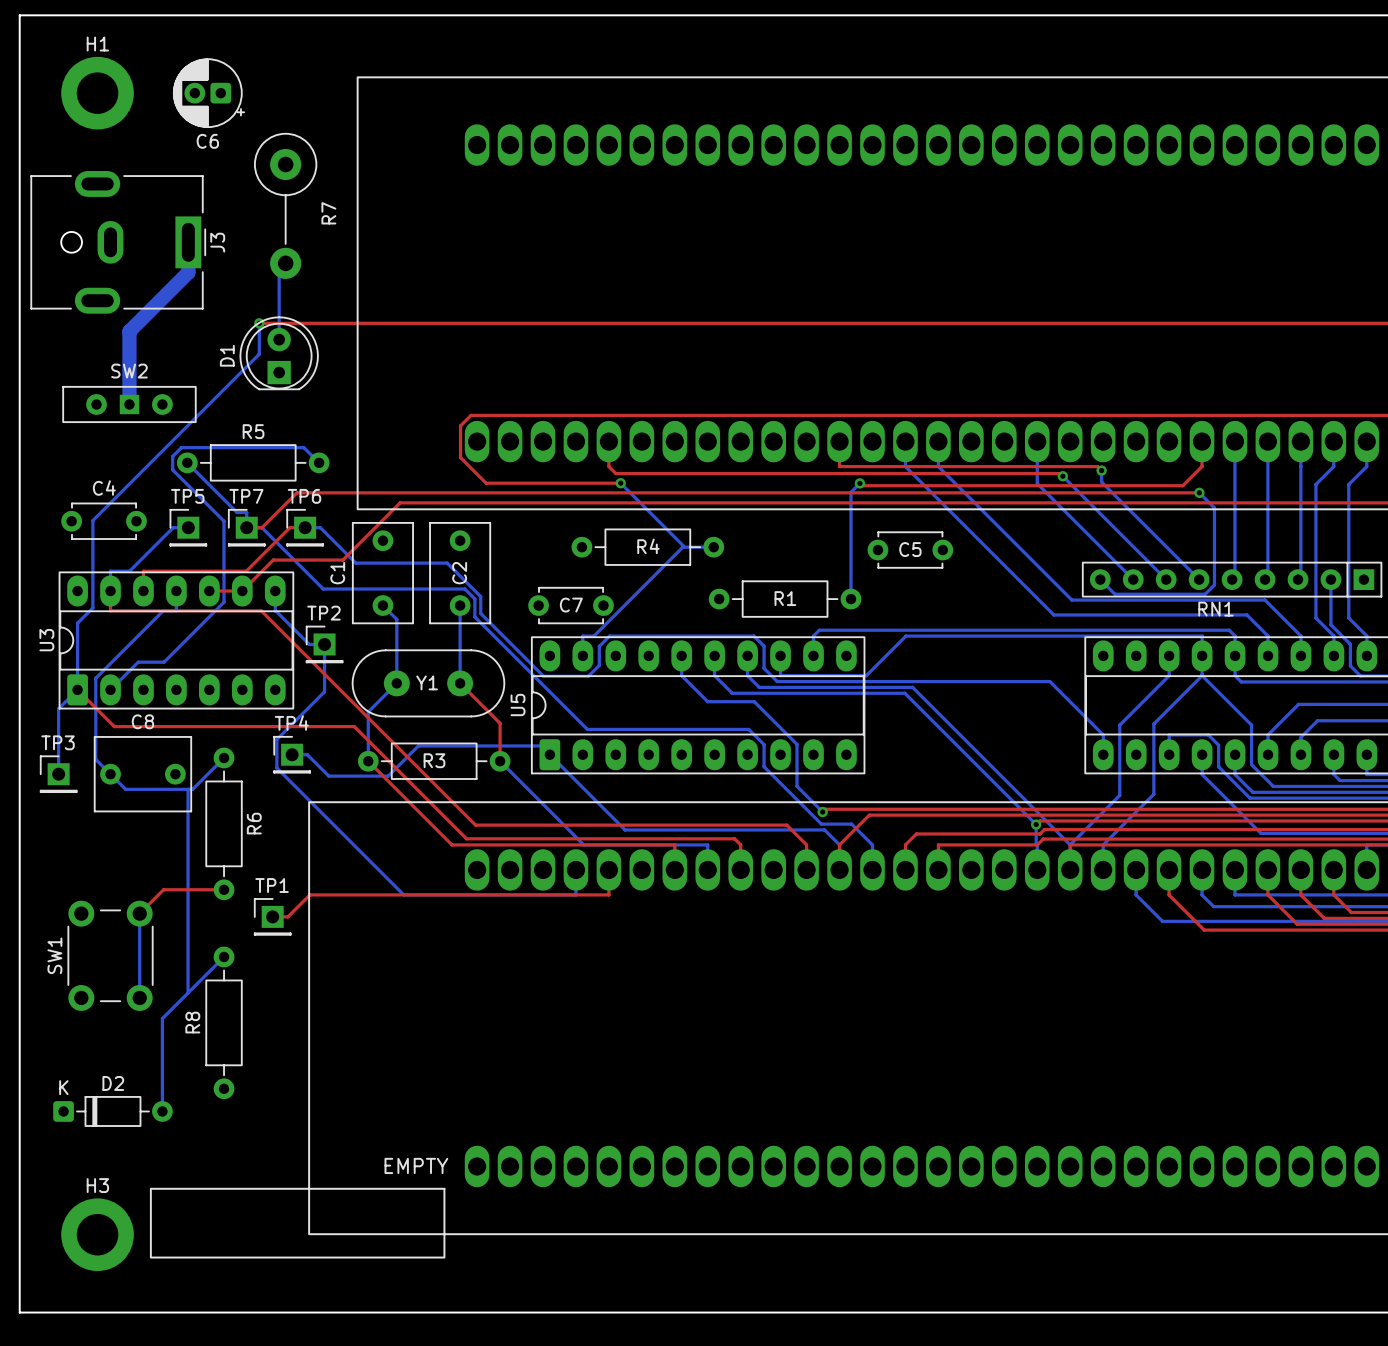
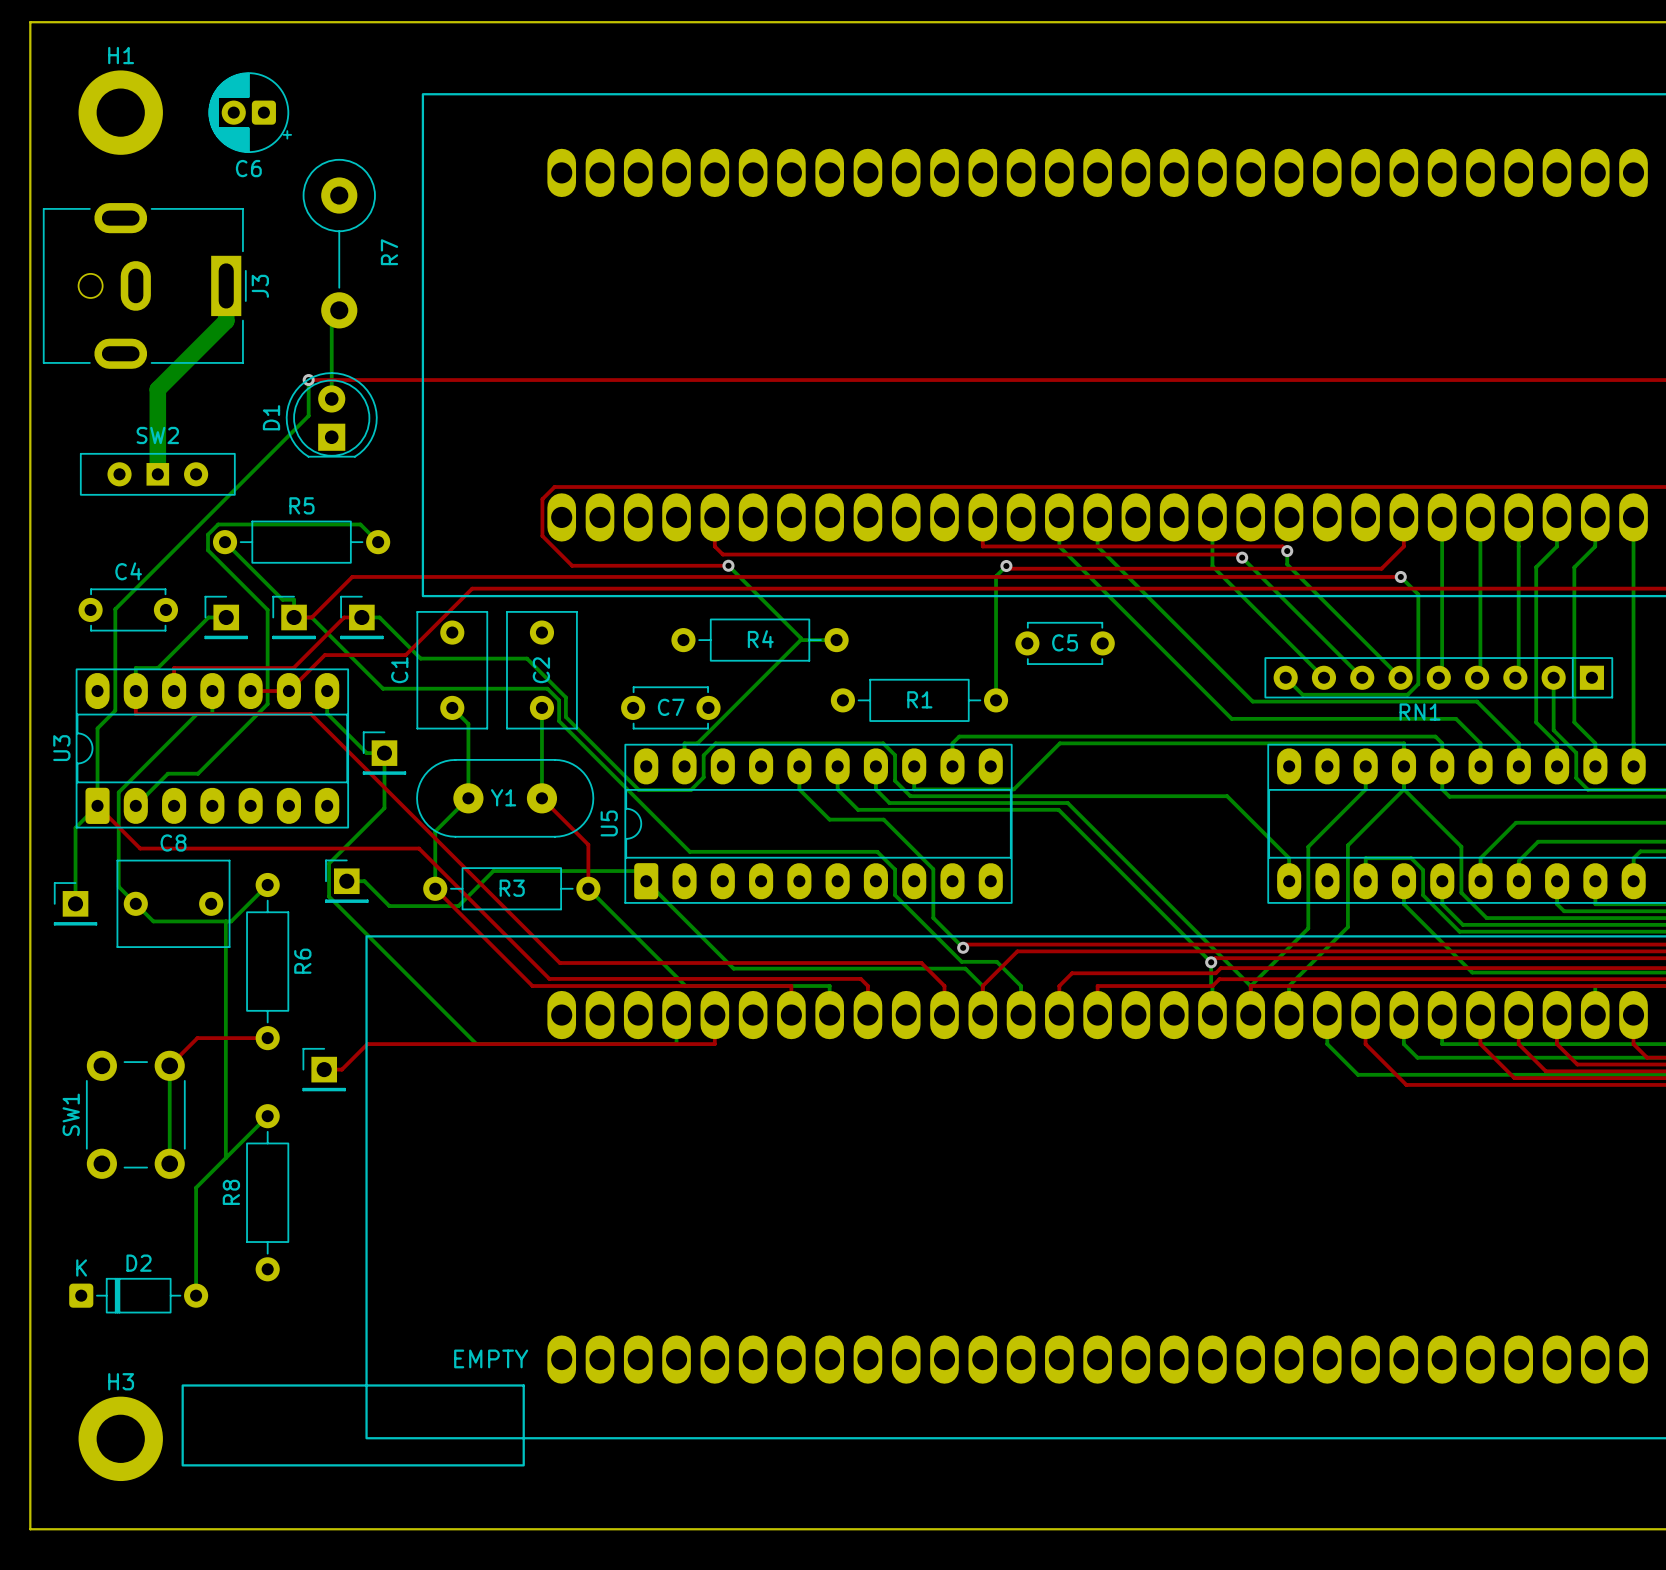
TP5 name: TP5 (187, 496) -> none
TP7 name: TP7 (246, 496) -> none
TP6 name: TP6 (304, 496) -> none
TP2 name: TP2 (323, 613) -> none
TP4 name: TP4 (291, 723) -> none
TP3 name: TP3 (58, 742) -> none
TP1 name: TP1 (272, 885) -> none

